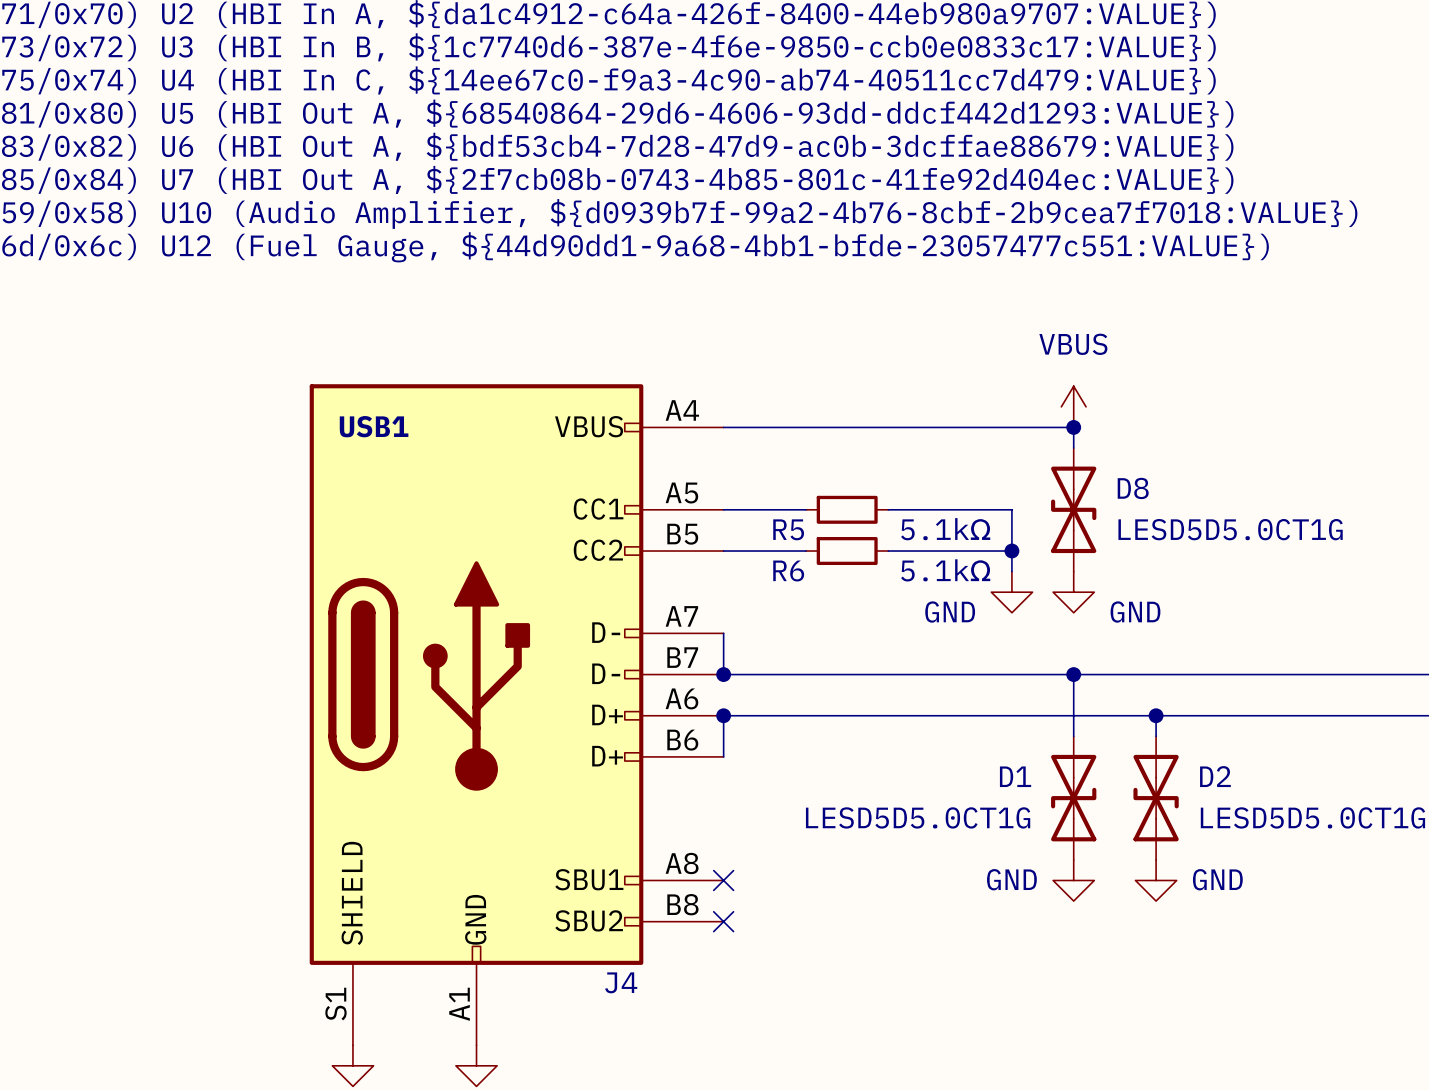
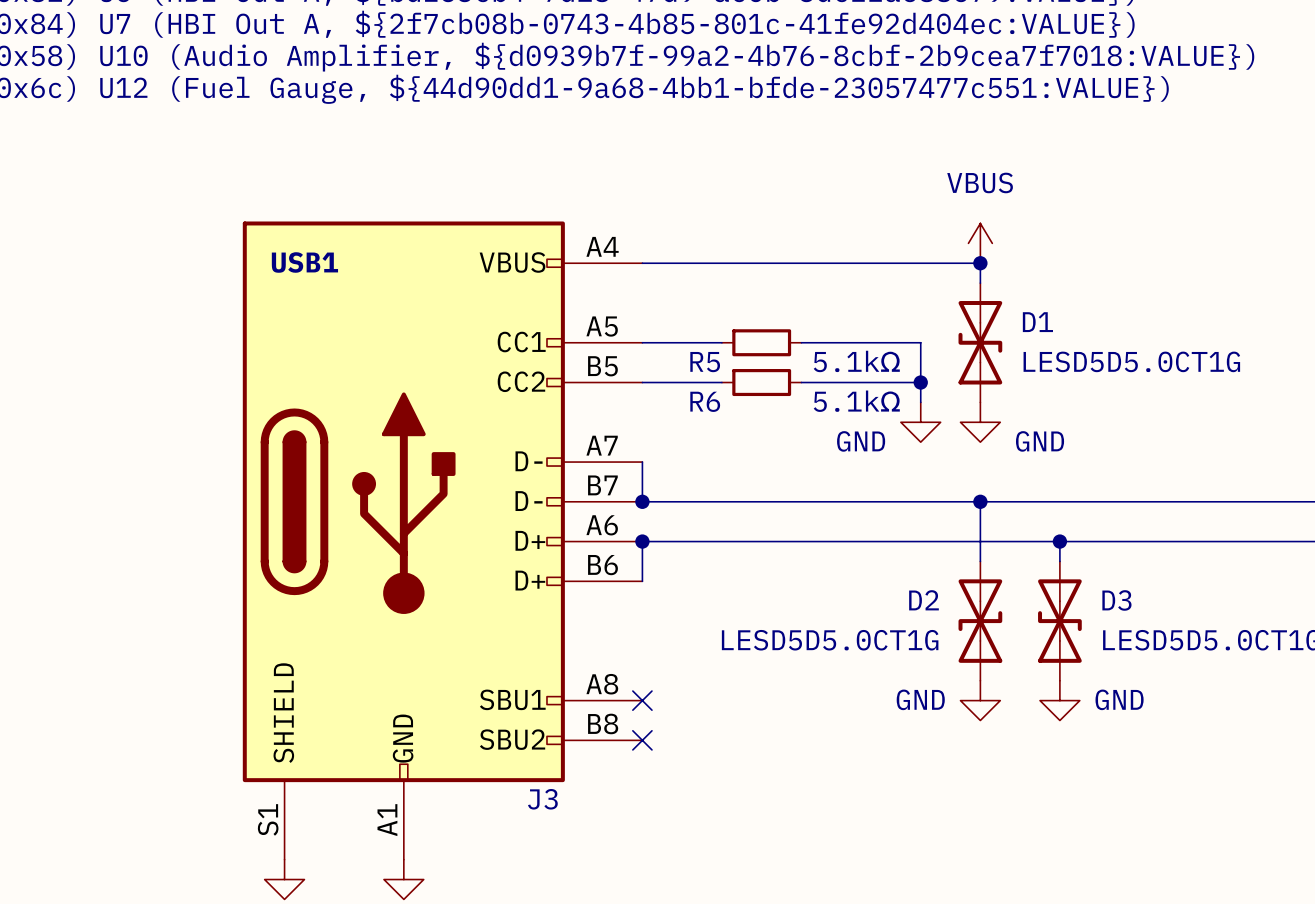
D8 name: D8 (1133, 488) -> D1 (1037, 322)
D1 name: D1 (1015, 776) -> D2 (923, 600)
D2 name: D2 (1215, 776) -> D3 (1116, 600)
J4 name: J4 (621, 982) -> J3 (542, 799)

